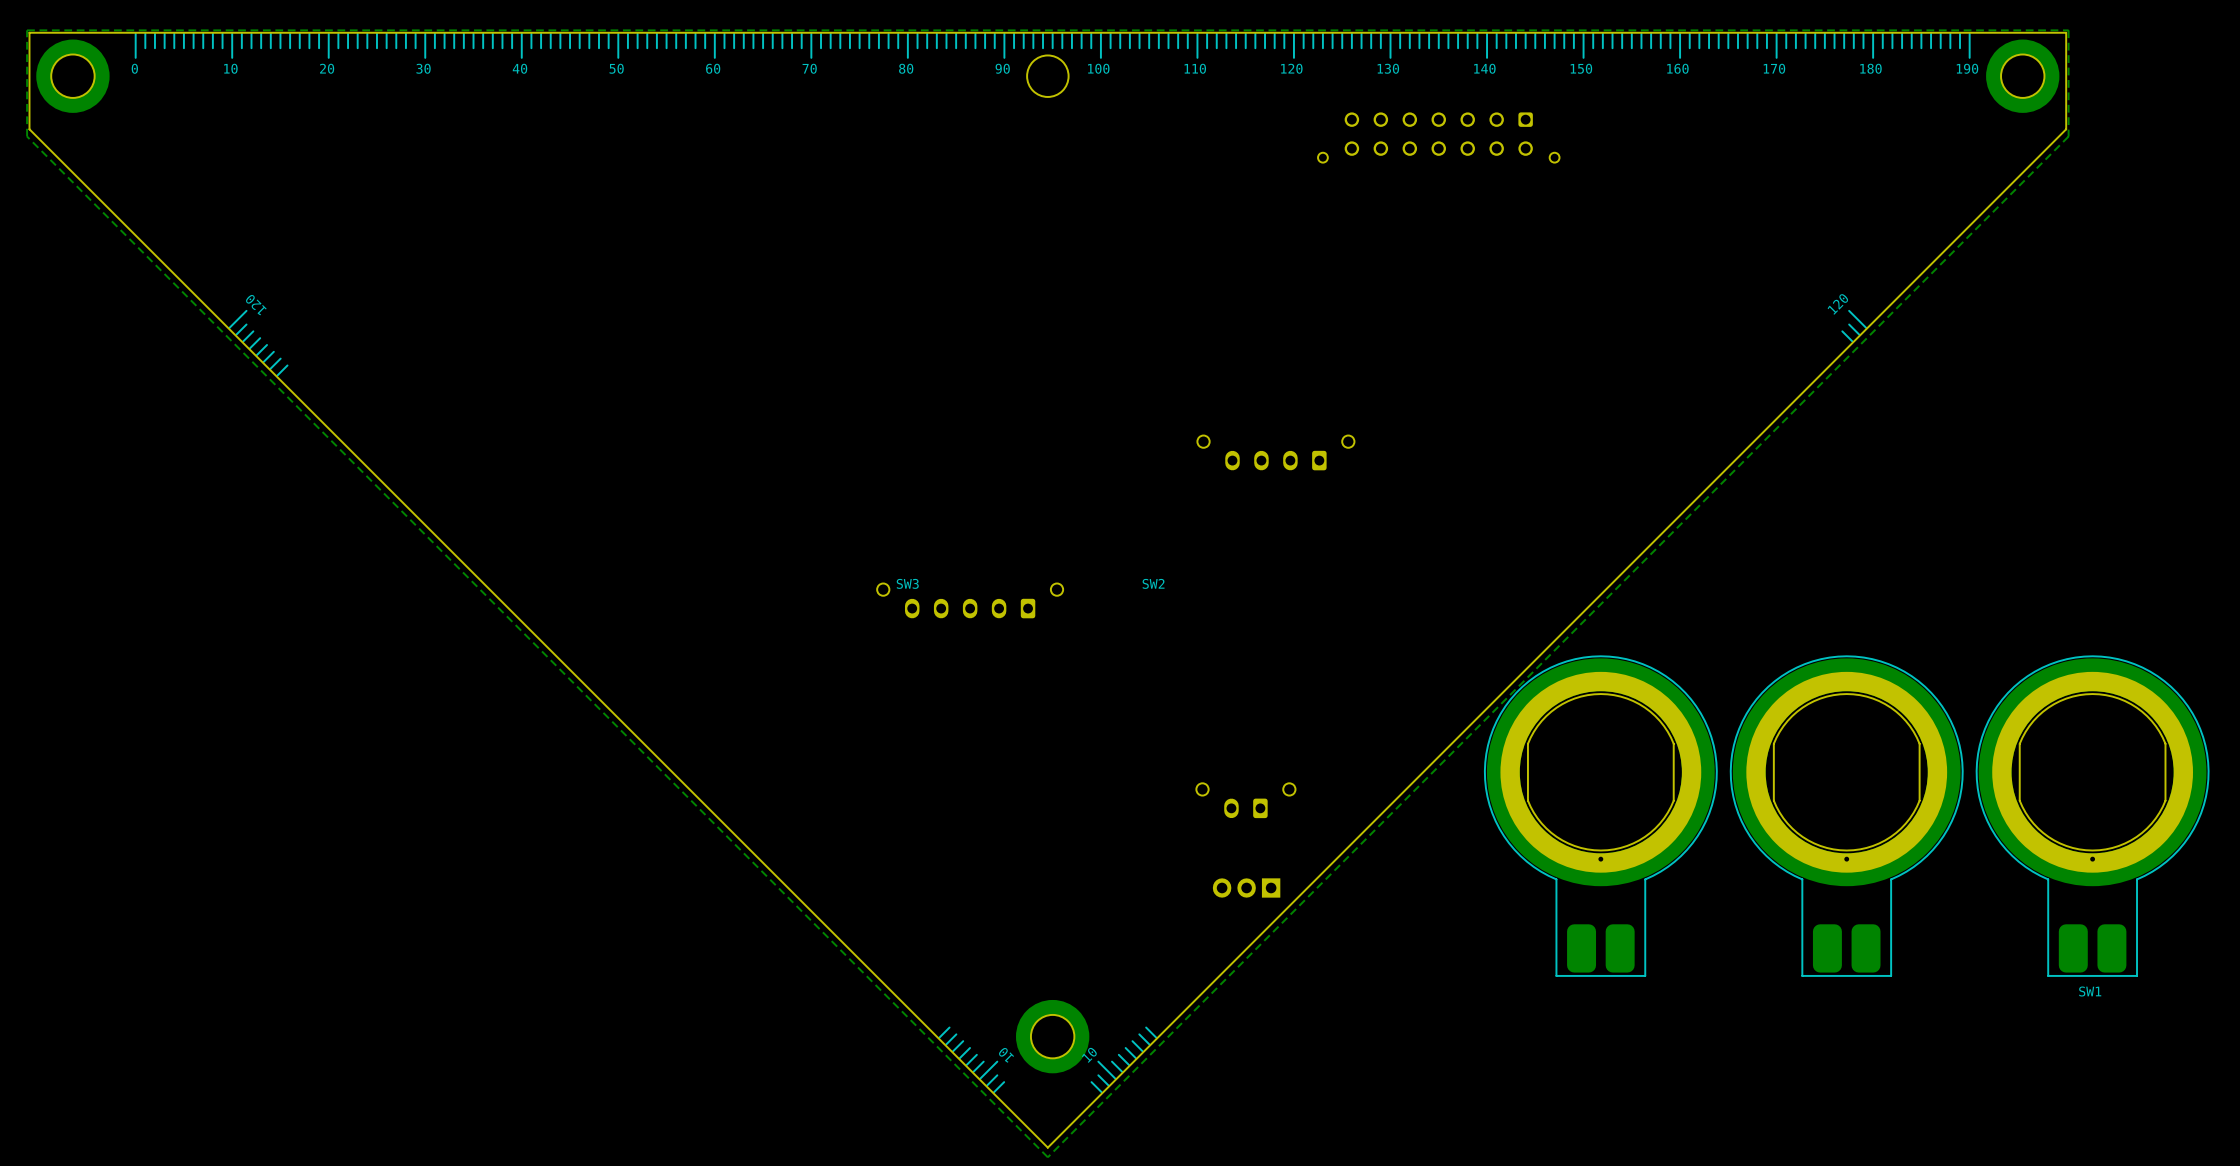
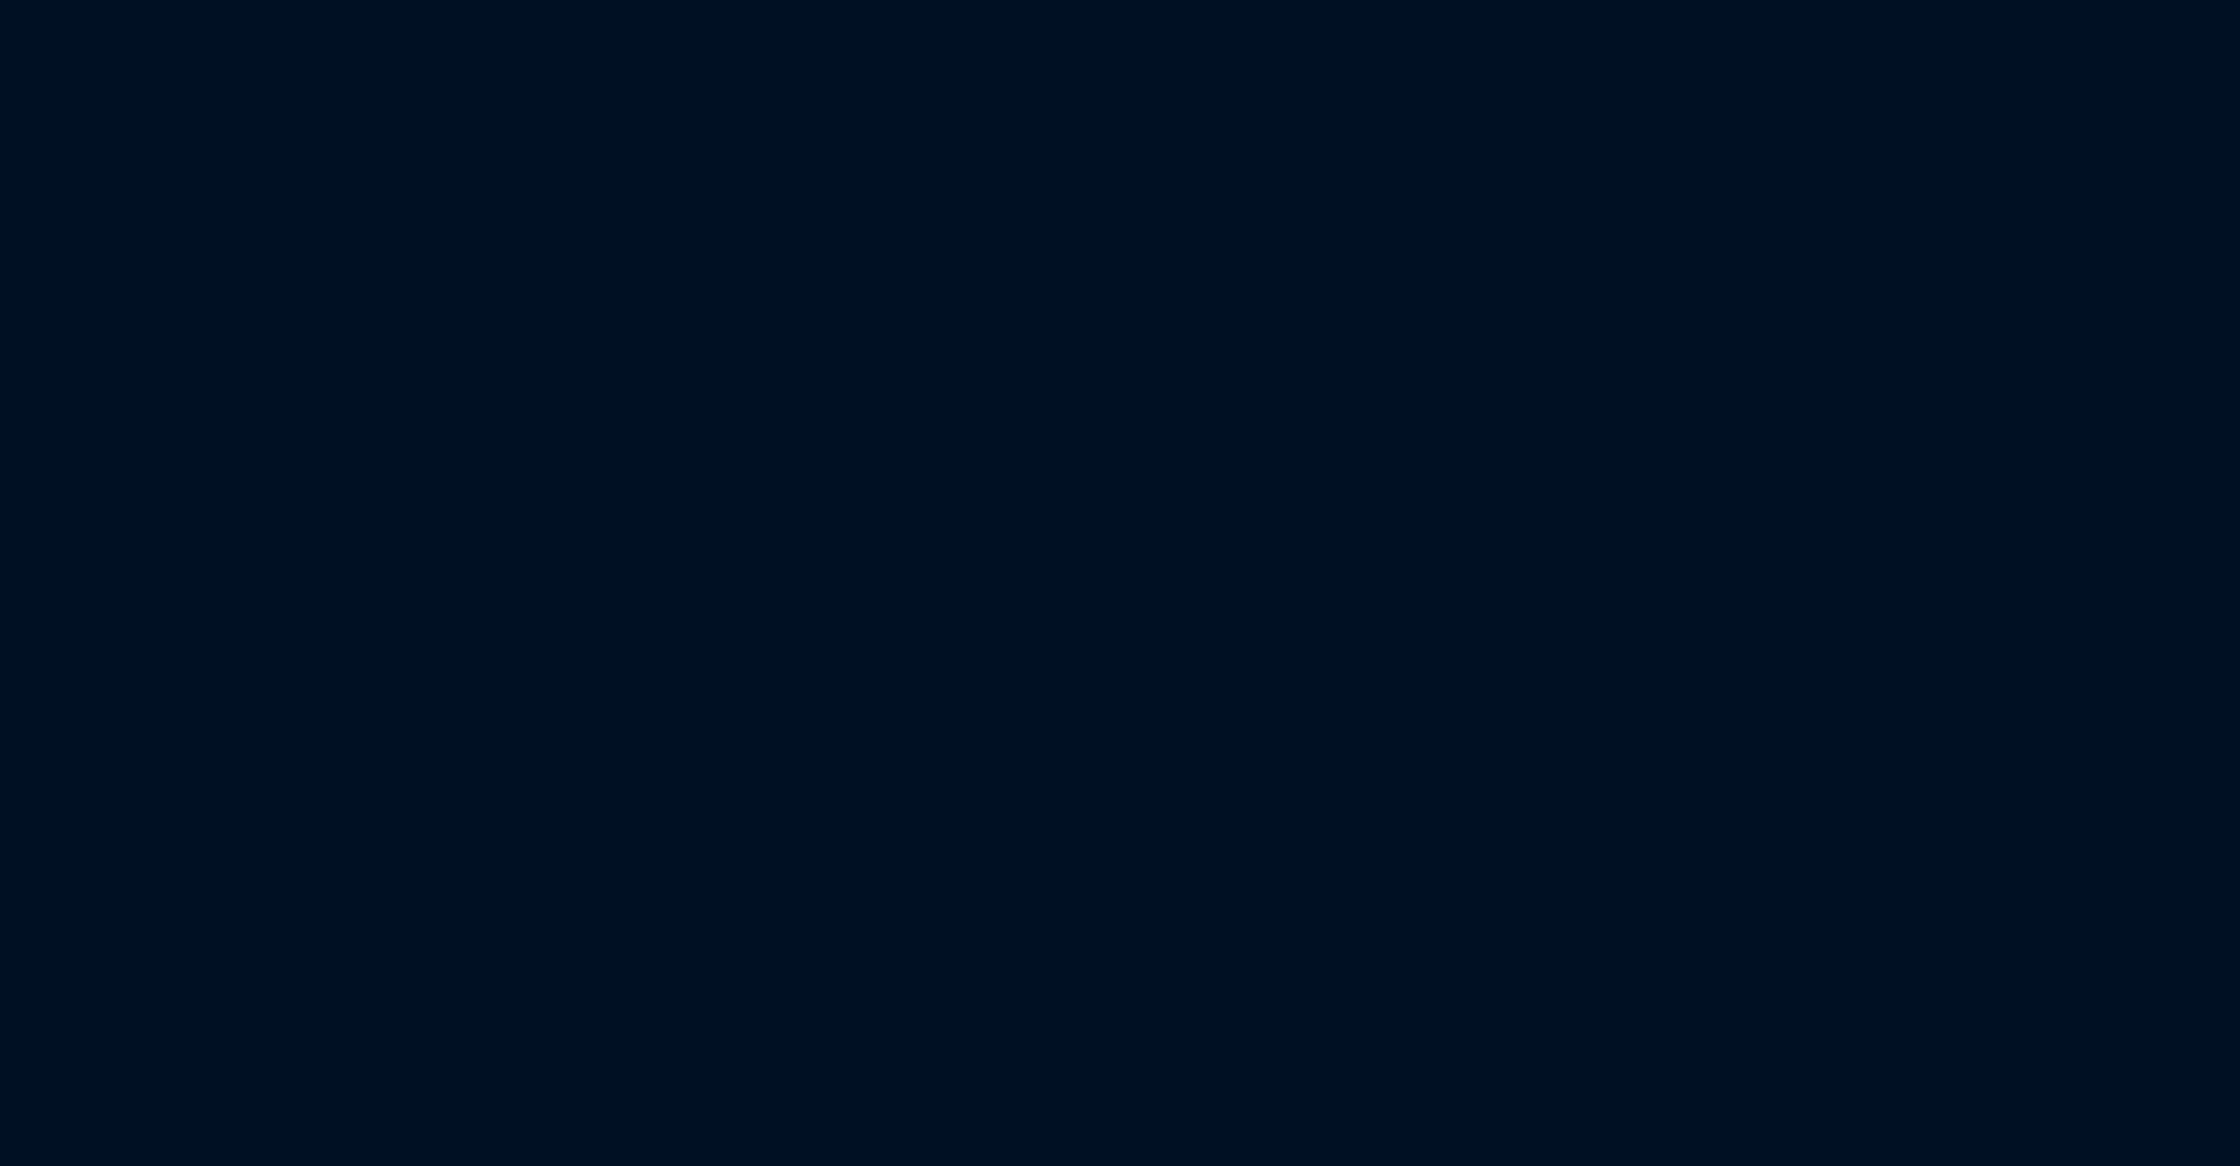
zone outline: (2068, 30) (2068, 136) (1047, 1157) (27, 136) (27, 30) (2068, 30) -> none
board edge: (2066, 32) (2066, 129) (1047, 1147) (29, 129) (29, 32) (2066, 32) -> none
line: (135, 33) (135, 57) -> none
line: (145, 33) (145, 48) -> none
line: (154, 33) (154, 48) -> none
line: (164, 33) (164, 48) -> none
line: (174, 33) (174, 48) -> none
line: (183, 33) (183, 48) -> none
line: (193, 33) (193, 48) -> none
line: (203, 33) (203, 48) -> none
line: (212, 33) (212, 48) -> none
line: (222, 33) (222, 48) -> none
line: (232, 33) (232, 57) -> none
line: (241, 33) (241, 48) -> none
line: (251, 33) (251, 48) -> none
line: (261, 33) (261, 48) -> none
line: (270, 33) (270, 48) -> none
line: (280, 33) (280, 48) -> none
line: (290, 33) (290, 48) -> none
line: (299, 33) (299, 48) -> none
line: (309, 33) (309, 48) -> none
line: (319, 33) (319, 48) -> none
line: (328, 33) (328, 57) -> none
line: (338, 33) (338, 48) -> none
line: (348, 33) (348, 48) -> none
line: (357, 33) (357, 48) -> none
line: (367, 33) (367, 48) -> none
line: (376, 33) (376, 48) -> none
line: (386, 33) (386, 48) -> none
line: (396, 33) (396, 48) -> none
line: (405, 33) (405, 48) -> none
line: (415, 33) (415, 48) -> none
line: (425, 33) (425, 57) -> none
line: (434, 33) (434, 48) -> none
line: (444, 33) (444, 48) -> none
line: (454, 33) (454, 48) -> none
line: (463, 33) (463, 48) -> none
line: (473, 33) (473, 48) -> none
line: (483, 33) (483, 48) -> none
line: (492, 33) (492, 48) -> none
line: (502, 33) (502, 48) -> none
line: (512, 33) (512, 48) -> none
line: (521, 33) (521, 57) -> none
line: (531, 33) (531, 48) -> none
line: (541, 33) (541, 48) -> none
line: (550, 33) (550, 48) -> none
line: (560, 33) (560, 48) -> none
line: (570, 33) (570, 48) -> none
line: (579, 33) (579, 48) -> none
line: (589, 33) (589, 48) -> none
line: (598, 33) (598, 48) -> none
line: (608, 33) (608, 48) -> none
line: (618, 33) (618, 57) -> none
line: (627, 33) (627, 48) -> none
line: (637, 33) (637, 48) -> none
line: (647, 33) (647, 48) -> none
line: (656, 33) (656, 48) -> none
line: (666, 33) (666, 48) -> none
line: (676, 33) (676, 48) -> none
line: (685, 33) (685, 48) -> none
line: (695, 33) (695, 48) -> none
line: (705, 33) (705, 48) -> none
line: (714, 33) (714, 57) -> none
line: (724, 33) (724, 48) -> none
line: (734, 33) (734, 48) -> none
line: (743, 33) (743, 48) -> none
line: (753, 33) (753, 48) -> none
line: (763, 33) (763, 48) -> none
line: (772, 33) (772, 48) -> none
line: (782, 33) (782, 48) -> none
line: (792, 33) (792, 48) -> none
line: (801, 33) (801, 48) -> none
line: (811, 33) (811, 57) -> none
line: (821, 33) (821, 48) -> none
line: (830, 33) (830, 48) -> none
line: (840, 33) (840, 48) -> none
line: (849, 33) (849, 48) -> none
line: (859, 33) (859, 48) -> none
line: (869, 33) (869, 48) -> none
line: (878, 33) (878, 48) -> none
line: (888, 33) (888, 48) -> none
line: (898, 33) (898, 48) -> none
line: (907, 33) (907, 57) -> none
line: (917, 33) (917, 48) -> none
line: (927, 33) (927, 48) -> none
line: (936, 33) (936, 48) -> none
line: (946, 33) (946, 48) -> none
line: (956, 33) (956, 48) -> none
line: (965, 33) (965, 48) -> none
line: (975, 33) (975, 48) -> none
line: (985, 33) (985, 48) -> none
line: (994, 33) (994, 48) -> none
line: (1004, 33) (1004, 57) -> none
line: (1014, 33) (1014, 48) -> none
line: (1023, 33) (1023, 48) -> none
line: (1033, 33) (1033, 48) -> none
line: (1043, 33) (1043, 48) -> none
line: (1052, 33) (1052, 48) -> none
line: (1062, 33) (1062, 48) -> none
line: (1071, 33) (1071, 48) -> none
line: (1081, 33) (1081, 48) -> none
line: (1091, 33) (1091, 48) -> none
line: (1100, 33) (1100, 57) -> none
line: (1110, 33) (1110, 48) -> none
line: (1120, 33) (1120, 48) -> none
line: (1129, 33) (1129, 48) -> none
line: (1139, 33) (1139, 48) -> none
line: (1149, 33) (1149, 48) -> none
line: (1158, 33) (1158, 48) -> none
line: (1168, 33) (1168, 48) -> none
line: (1178, 33) (1178, 48) -> none
line: (1187, 33) (1187, 48) -> none
line: (1197, 33) (1197, 57) -> none
line: (1207, 33) (1207, 48) -> none
line: (1216, 33) (1216, 48) -> none
line: (1226, 33) (1226, 48) -> none
line: (1236, 33) (1236, 48) -> none
line: (1245, 33) (1245, 48) -> none
line: (1255, 33) (1255, 48) -> none
line: (1265, 33) (1265, 48) -> none
line: (1274, 33) (1274, 48) -> none
line: (1284, 33) (1284, 48) -> none
line: (1293, 33) (1293, 57) -> none
line: (1303, 33) (1303, 48) -> none
line: (1313, 33) (1313, 48) -> none
line: (1322, 33) (1322, 48) -> none
line: (1332, 33) (1332, 48) -> none
line: (1342, 33) (1342, 48) -> none
line: (1351, 33) (1351, 48) -> none
line: (1361, 33) (1361, 48) -> none
line: (1371, 33) (1371, 48) -> none
line: (1380, 33) (1380, 48) -> none
line: (1390, 33) (1390, 57) -> none
line: (1400, 33) (1400, 48) -> none
line: (1409, 33) (1409, 48) -> none
line: (1419, 33) (1419, 48) -> none
line: (1429, 33) (1429, 48) -> none
line: (1438, 33) (1438, 48) -> none
line: (1448, 33) (1448, 48) -> none
line: (1458, 33) (1458, 48) -> none
line: (1467, 33) (1467, 48) -> none
line: (1477, 33) (1477, 48) -> none
line: (1487, 33) (1487, 57) -> none
line: (1496, 33) (1496, 48) -> none
line: (1506, 33) (1506, 48) -> none
line: (1515, 33) (1515, 48) -> none
line: (1525, 33) (1525, 48) -> none
line: (1535, 33) (1535, 48) -> none
line: (1544, 33) (1544, 48) -> none
line: (1554, 33) (1554, 48) -> none
line: (1564, 33) (1564, 48) -> none
line: (1573, 33) (1573, 48) -> none
line: (1583, 33) (1583, 57) -> none
line: (1593, 33) (1593, 48) -> none
line: (1602, 33) (1602, 48) -> none
line: (1612, 33) (1612, 48) -> none
line: (1622, 33) (1622, 48) -> none
line: (1631, 33) (1631, 48) -> none
line: (1641, 33) (1641, 48) -> none
line: (1651, 33) (1651, 48) -> none
line: (1660, 33) (1660, 48) -> none
line: (1670, 33) (1670, 48) -> none
line: (1680, 33) (1680, 57) -> none
line: (1689, 33) (1689, 48) -> none
line: (1699, 33) (1699, 48) -> none
line: (1709, 33) (1709, 48) -> none
line: (1718, 33) (1718, 48) -> none
line: (1728, 33) (1728, 48) -> none
line: (1737, 33) (1737, 48) -> none
line: (1747, 33) (1747, 48) -> none
line: (1757, 33) (1757, 48) -> none
line: (1766, 33) (1766, 48) -> none
line: (1776, 33) (1776, 57) -> none
line: (1786, 33) (1786, 48) -> none
line: (1795, 33) (1795, 48) -> none
line: (1805, 33) (1805, 48) -> none
line: (1815, 33) (1815, 48) -> none
line: (1824, 33) (1824, 48) -> none
line: (1834, 33) (1834, 48) -> none
line: (1844, 33) (1844, 48) -> none
line: (1853, 33) (1853, 48) -> none
line: (1863, 33) (1863, 48) -> none
line: (1873, 33) (1873, 57) -> none
line: (1882, 33) (1882, 48) -> none
line: (1892, 33) (1892, 48) -> none
line: (1902, 33) (1902, 48) -> none
line: (1911, 33) (1911, 48) -> none
line: (1921, 33) (1921, 48) -> none
line: (1931, 33) (1931, 48) -> none
line: (1940, 33) (1940, 48) -> none
line: (1950, 33) (1950, 48) -> none
line: (1960, 33) (1960, 48) -> none
line: (1969, 33) (1969, 57) -> none
round board edge: [1026, 54, 1070, 98] -> none
text: 0 (134, 68) -> none
text: 10 (230, 68) -> none
text: 20 (327, 68) -> none
text: 30 (423, 68) -> none
text: 40 (519, 68) -> none
text: 50 (616, 68) -> none
text: 60 (713, 68) -> none
text: 70 (809, 68) -> none
text: 80 (906, 68) -> none
text: 90 (1002, 68) -> none
text: 100 (1098, 68) -> none
text: 110 (1195, 68) -> none
text: 120 (1291, 68) -> none
text: 130 (1388, 68) -> none
text: 140 (1484, 68) -> none
text: 150 (1581, 68) -> none
text: 160 (1677, 68) -> none
text: 170 (1774, 68) -> none
text: 180 (1870, 68) -> none
text: 190 (1967, 68) -> none
part: (72, 76) -> none
part: (2022, 76) -> none
part: (1438, 137) -> none
text: 120 (1837, 304) -> none
text: 120 (256, 305) -> none
line: (246, 310) (229, 327) -> none
line: (1849, 310) (1866, 327) -> none
line: (246, 324) (236, 334) -> none
line: (1849, 324) (1859, 334) -> none
line: (253, 331) (243, 341) -> none
line: (1842, 331) (1852, 341) -> none
line: (260, 338) (249, 348) -> none
line: (267, 344) (256, 355) -> none
line: (273, 351) (263, 362) -> none
line: (280, 358) (270, 368) -> none
line: (287, 365) (277, 375) -> none
part: (1275, 452) -> none
part: (970, 600) -> none
part: (1245, 800) -> none
SW3: (1600, 816) -> none
SW2: (1846, 816) -> none
SW1: (2092, 816) -> none
part: (1246, 887) -> none
line: (949, 1027) (939, 1037) -> none
line: (1146, 1027) (1156, 1037) -> none
line: (956, 1034) (946, 1044) -> none
line: (1139, 1034) (1149, 1044) -> none
part: (1052, 1036) -> none
line: (963, 1041) (952, 1051) -> none
line: (1132, 1041) (1142, 1051) -> none
line: (970, 1047) (959, 1058) -> none
line: (1125, 1047) (1135, 1058) -> none
line: (976, 1054) (966, 1065) -> none
line: (1118, 1054) (1129, 1065) -> none
text: 10 (1006, 1055) -> none
text: 10 (1089, 1055) -> none
line: (983, 1061) (973, 1071) -> none
line: (997, 1061) (980, 1078) -> none
line: (1098, 1061) (1115, 1078) -> none
line: (1111, 1061) (1122, 1071) -> none
line: (997, 1075) (987, 1085) -> none
line: (1098, 1075) (1108, 1085) -> none
line: (1004, 1082) (993, 1092) -> none
line: (1091, 1082) (1101, 1092) -> none

